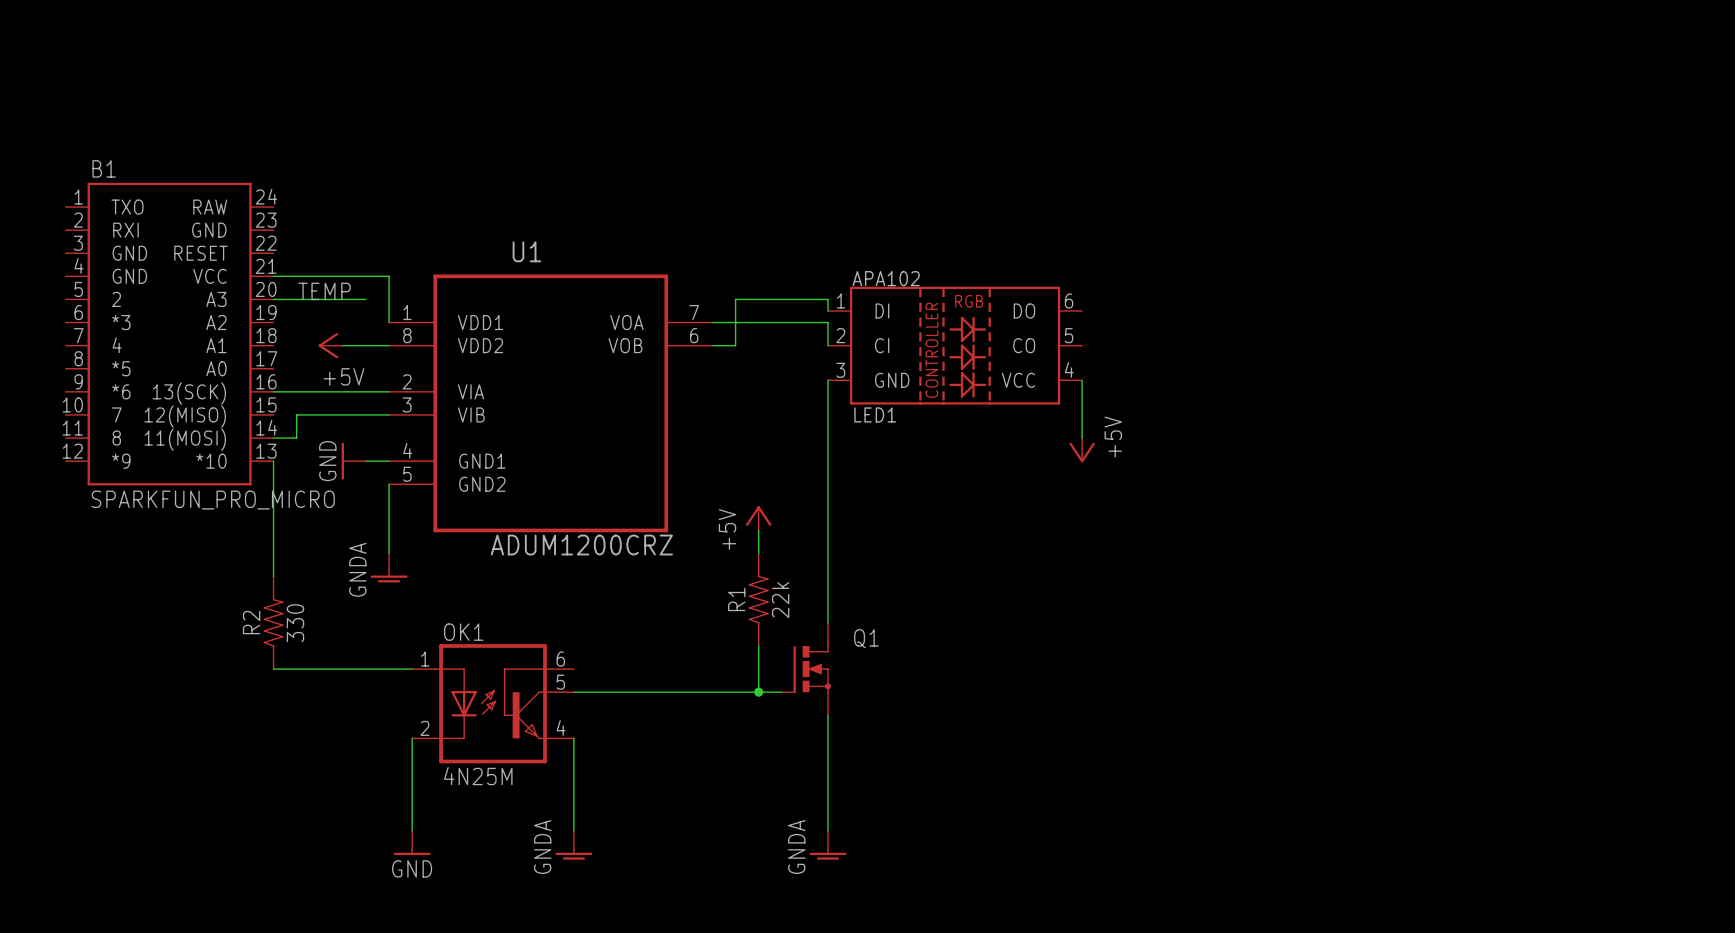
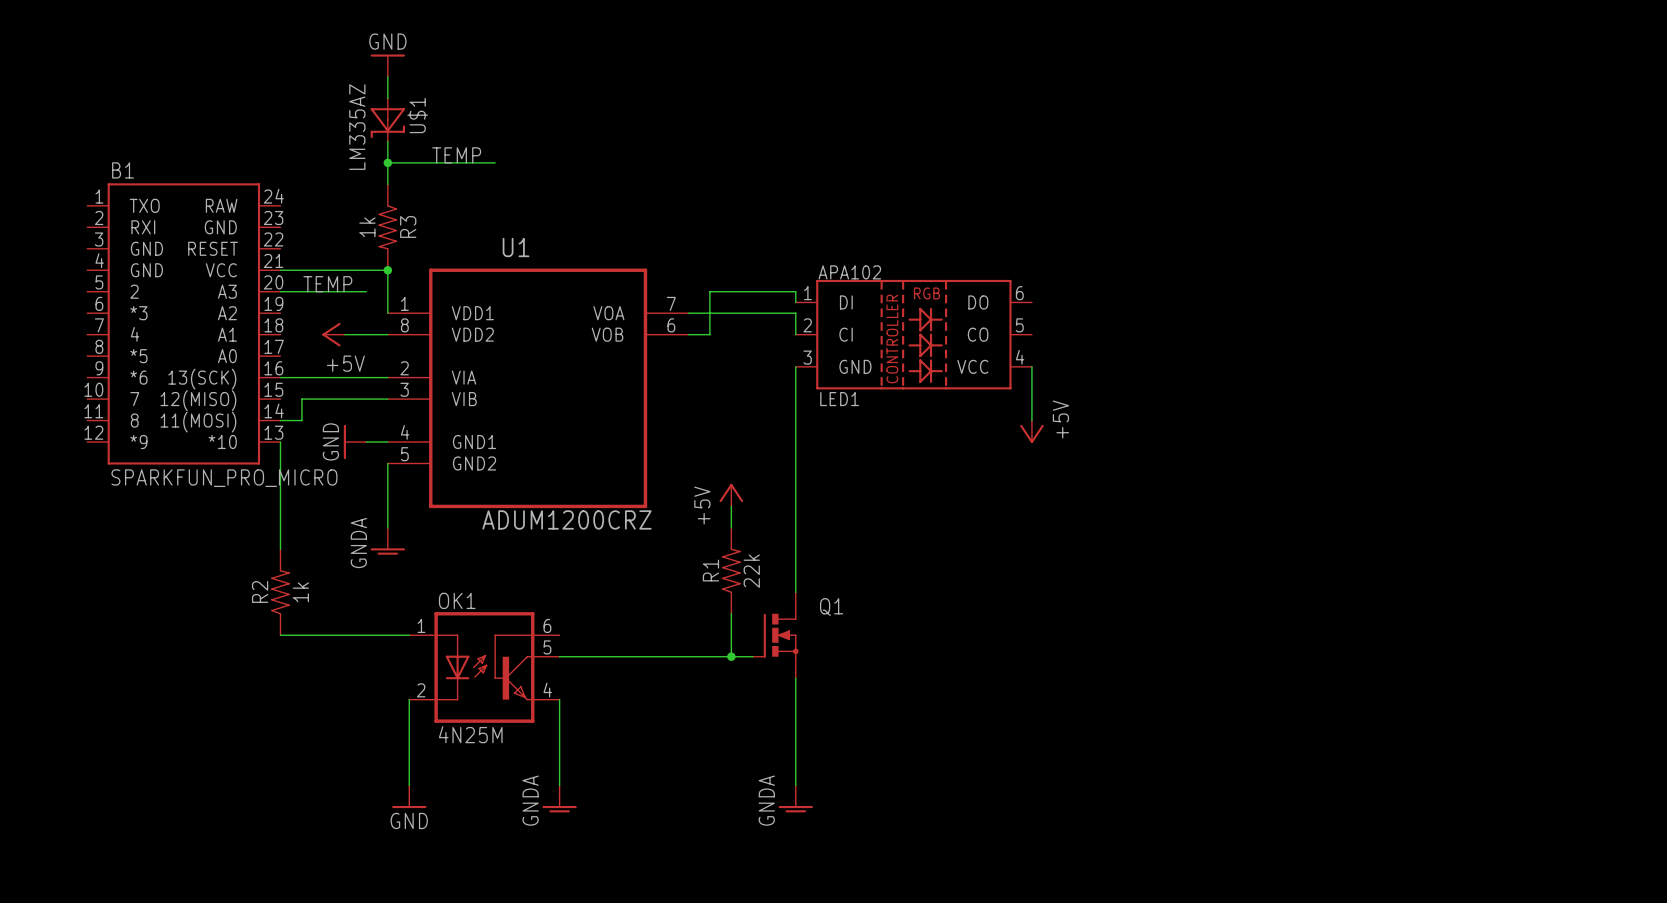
power symbol: none -> GND (387, 65)
wire: none -> (387, 77) (387, 98)
U$1: none -> LM335AZ (387, 119)
wire: none -> (387, 141) (387, 184)
label: none -> TEMP (456, 155)
wire: none -> (387, 162) (495, 162)
junction: none -> (387, 162)
R3: none -> 1k (387, 227)
junction: none -> (387, 270)
R2 value: 330 (295, 623) -> 1k (300, 592)

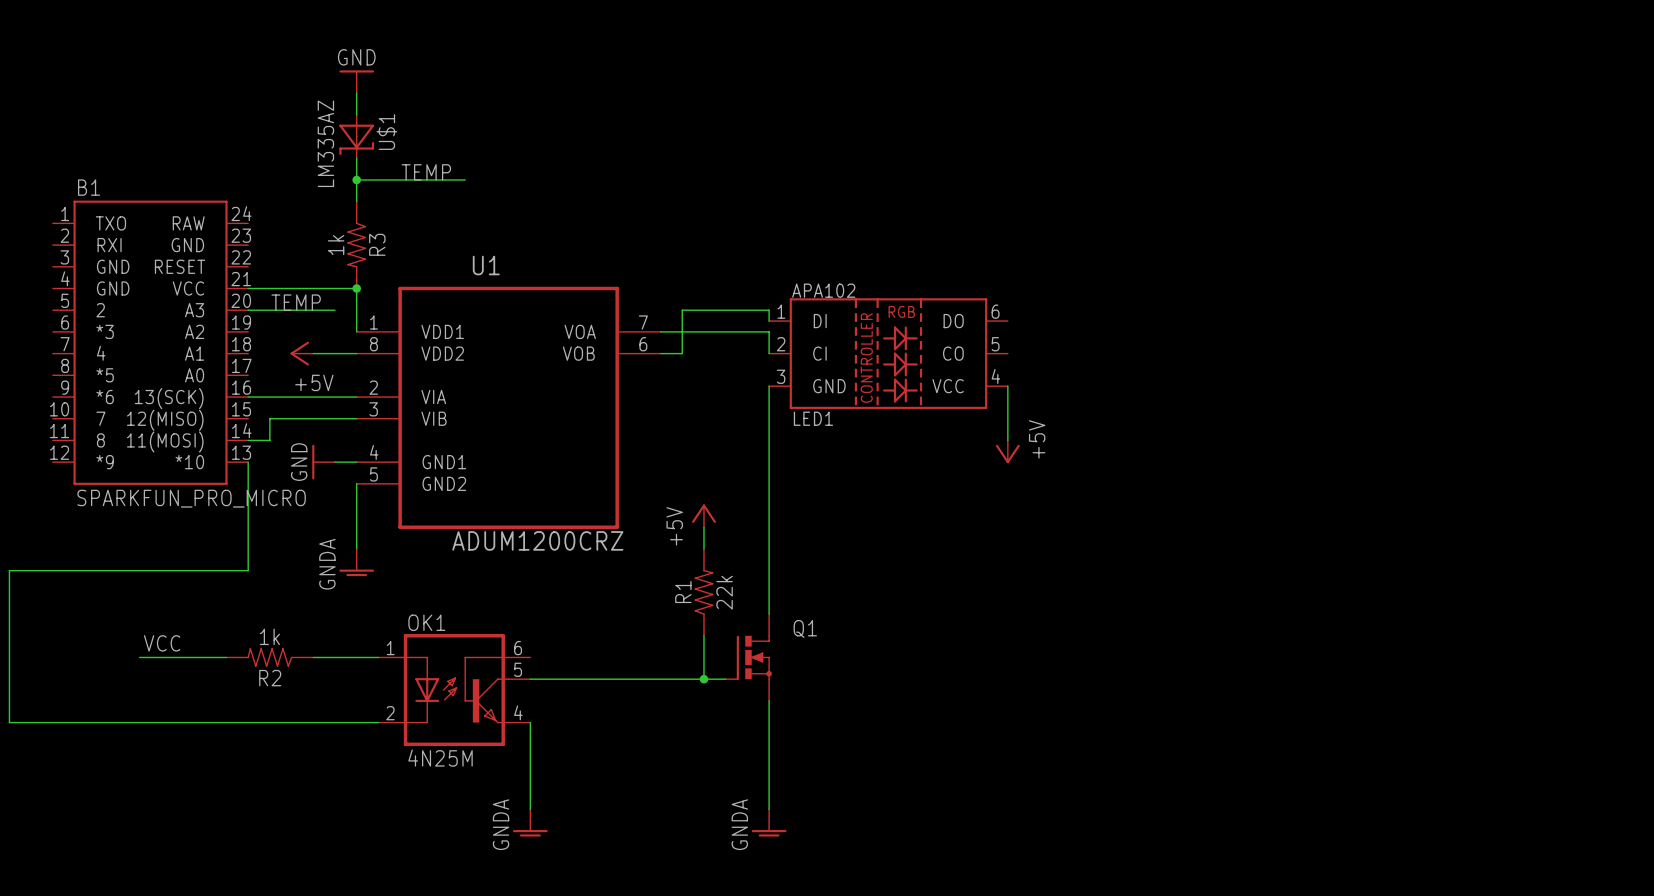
R2 rotation: 0° (280, 592) -> 90° counterclockwise (269, 657)
label: none -> VCC (162, 643)
wire: none -> (139, 657) (226, 657)
wire: (409, 699) (409, 785) -> (378, 722) (9, 722) (9, 570) (248, 570)
power symbol: GND (409, 796) -> none

